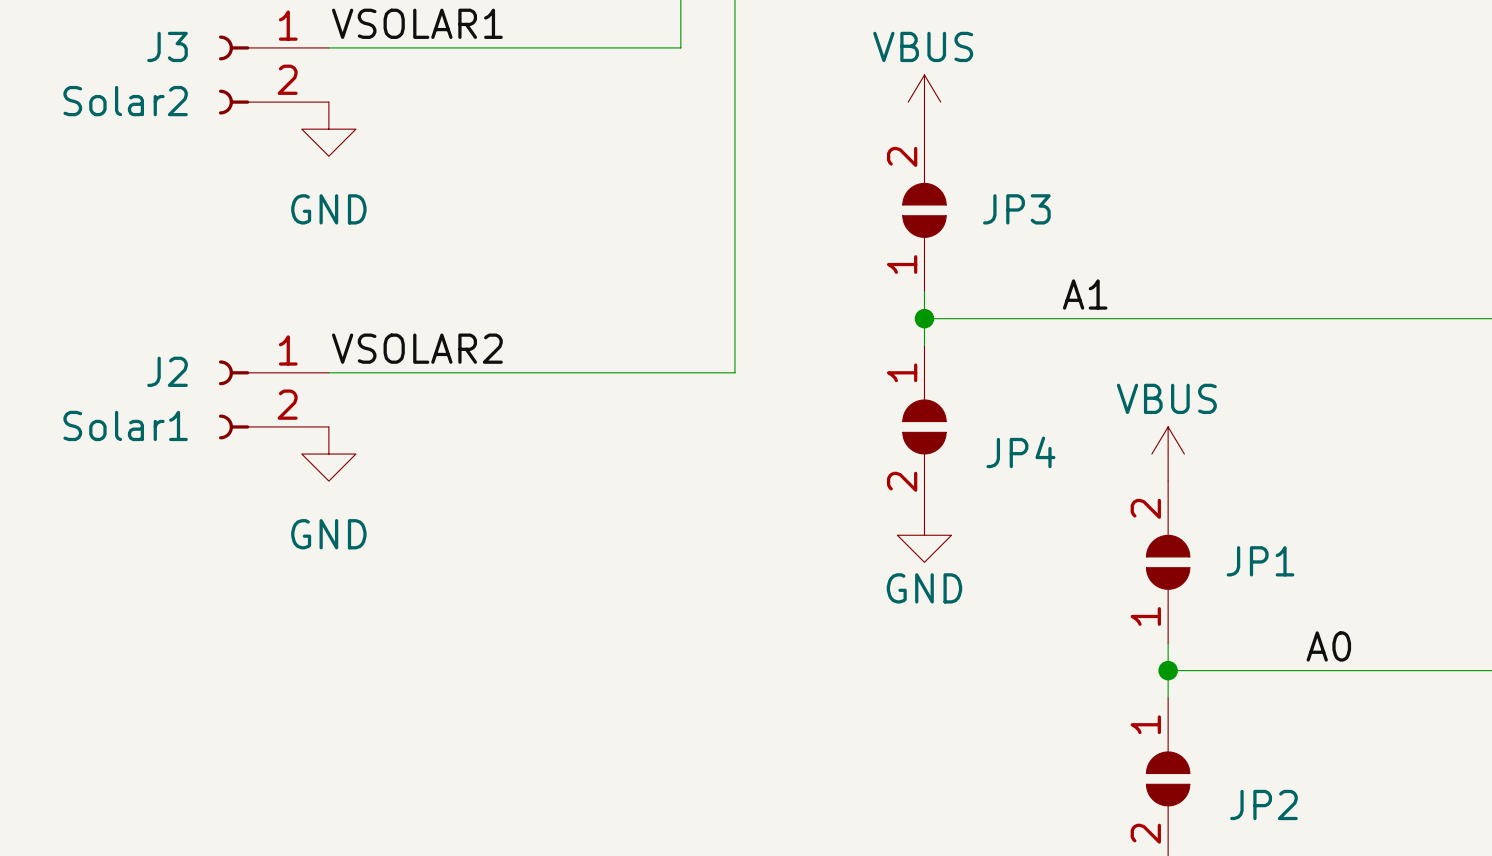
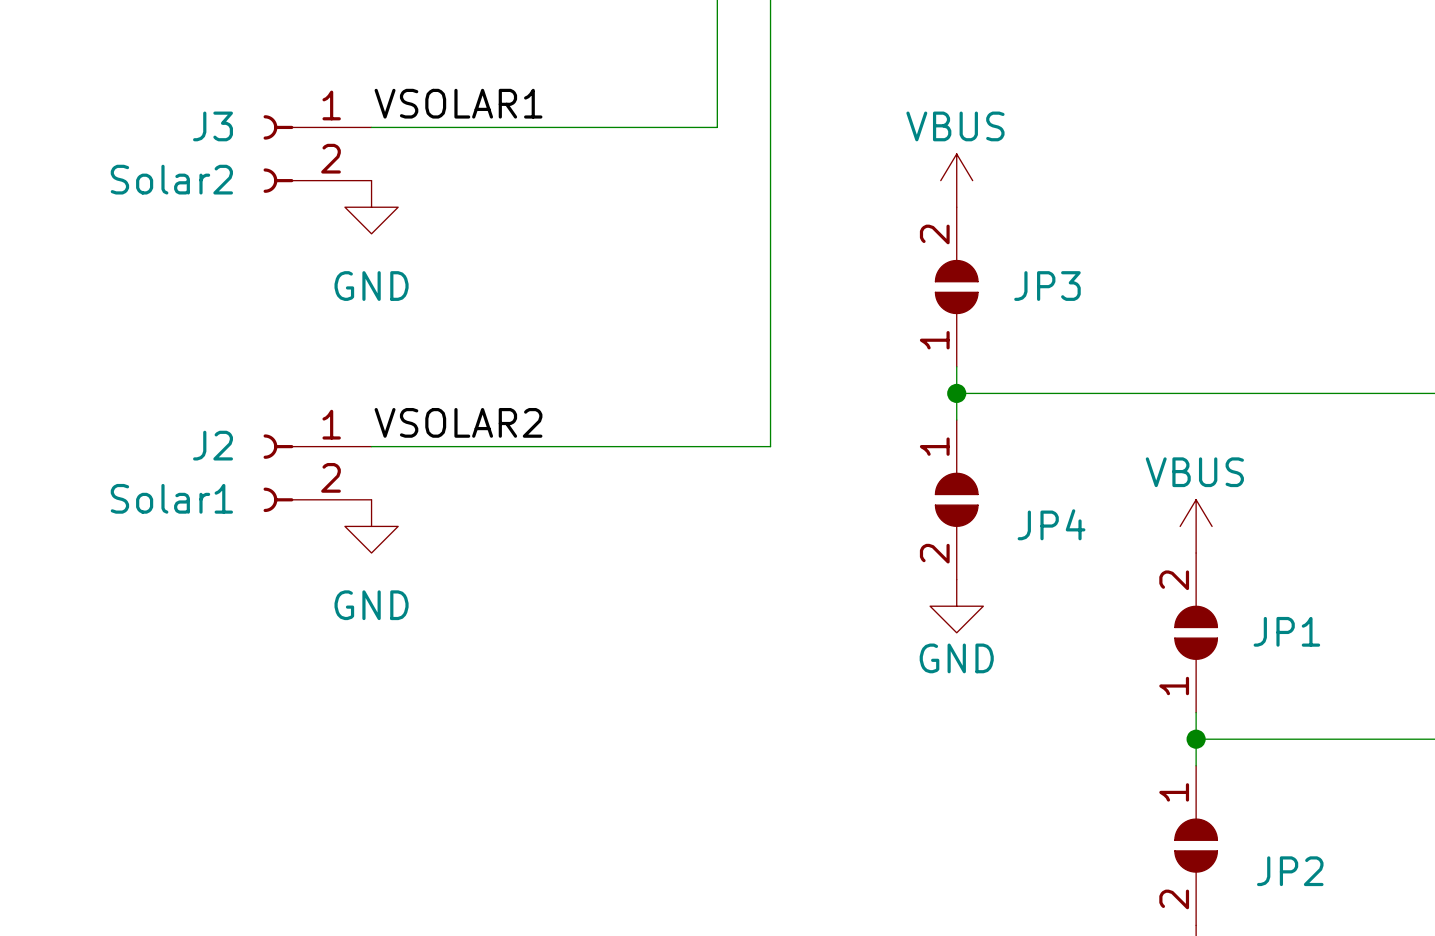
label: A1 (1085, 294) -> none
label: A0 (1328, 646) -> none

